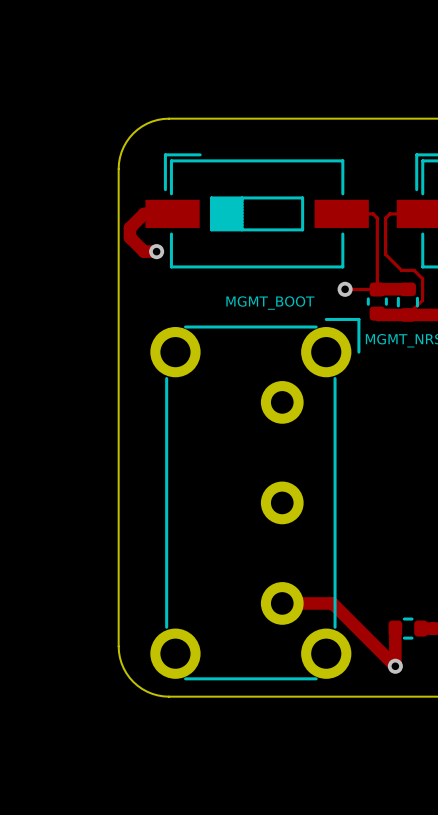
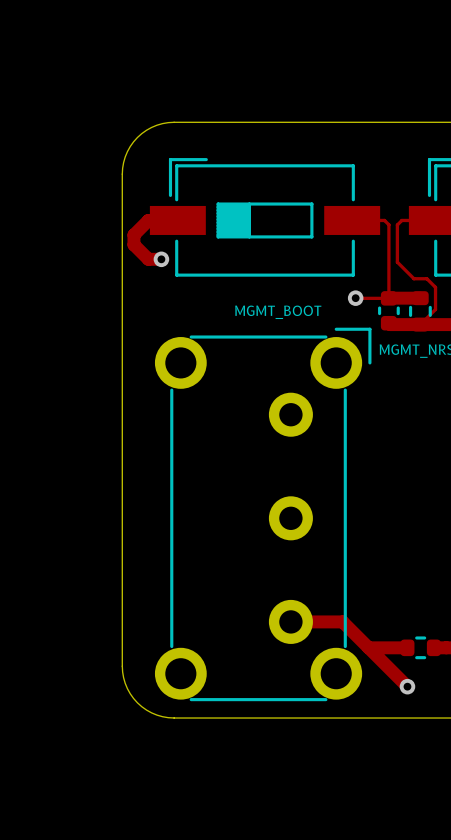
track: (395, 628) (395, 666) -> (407, 647) (368, 647)

